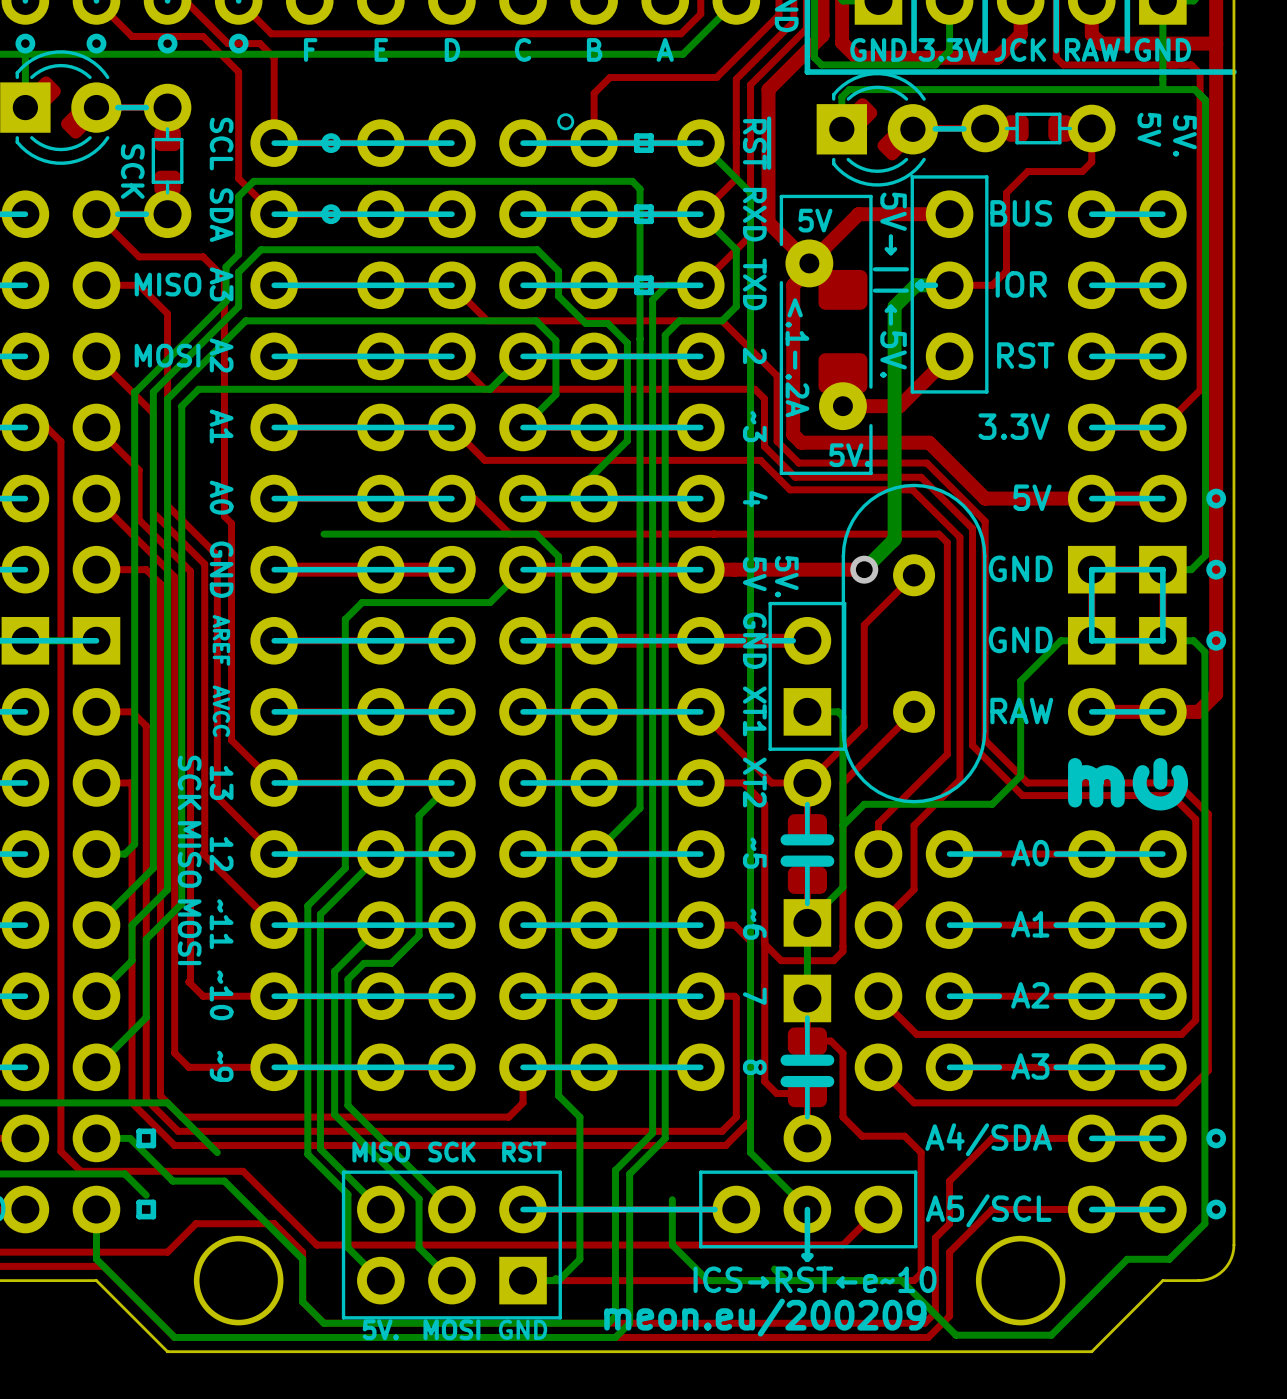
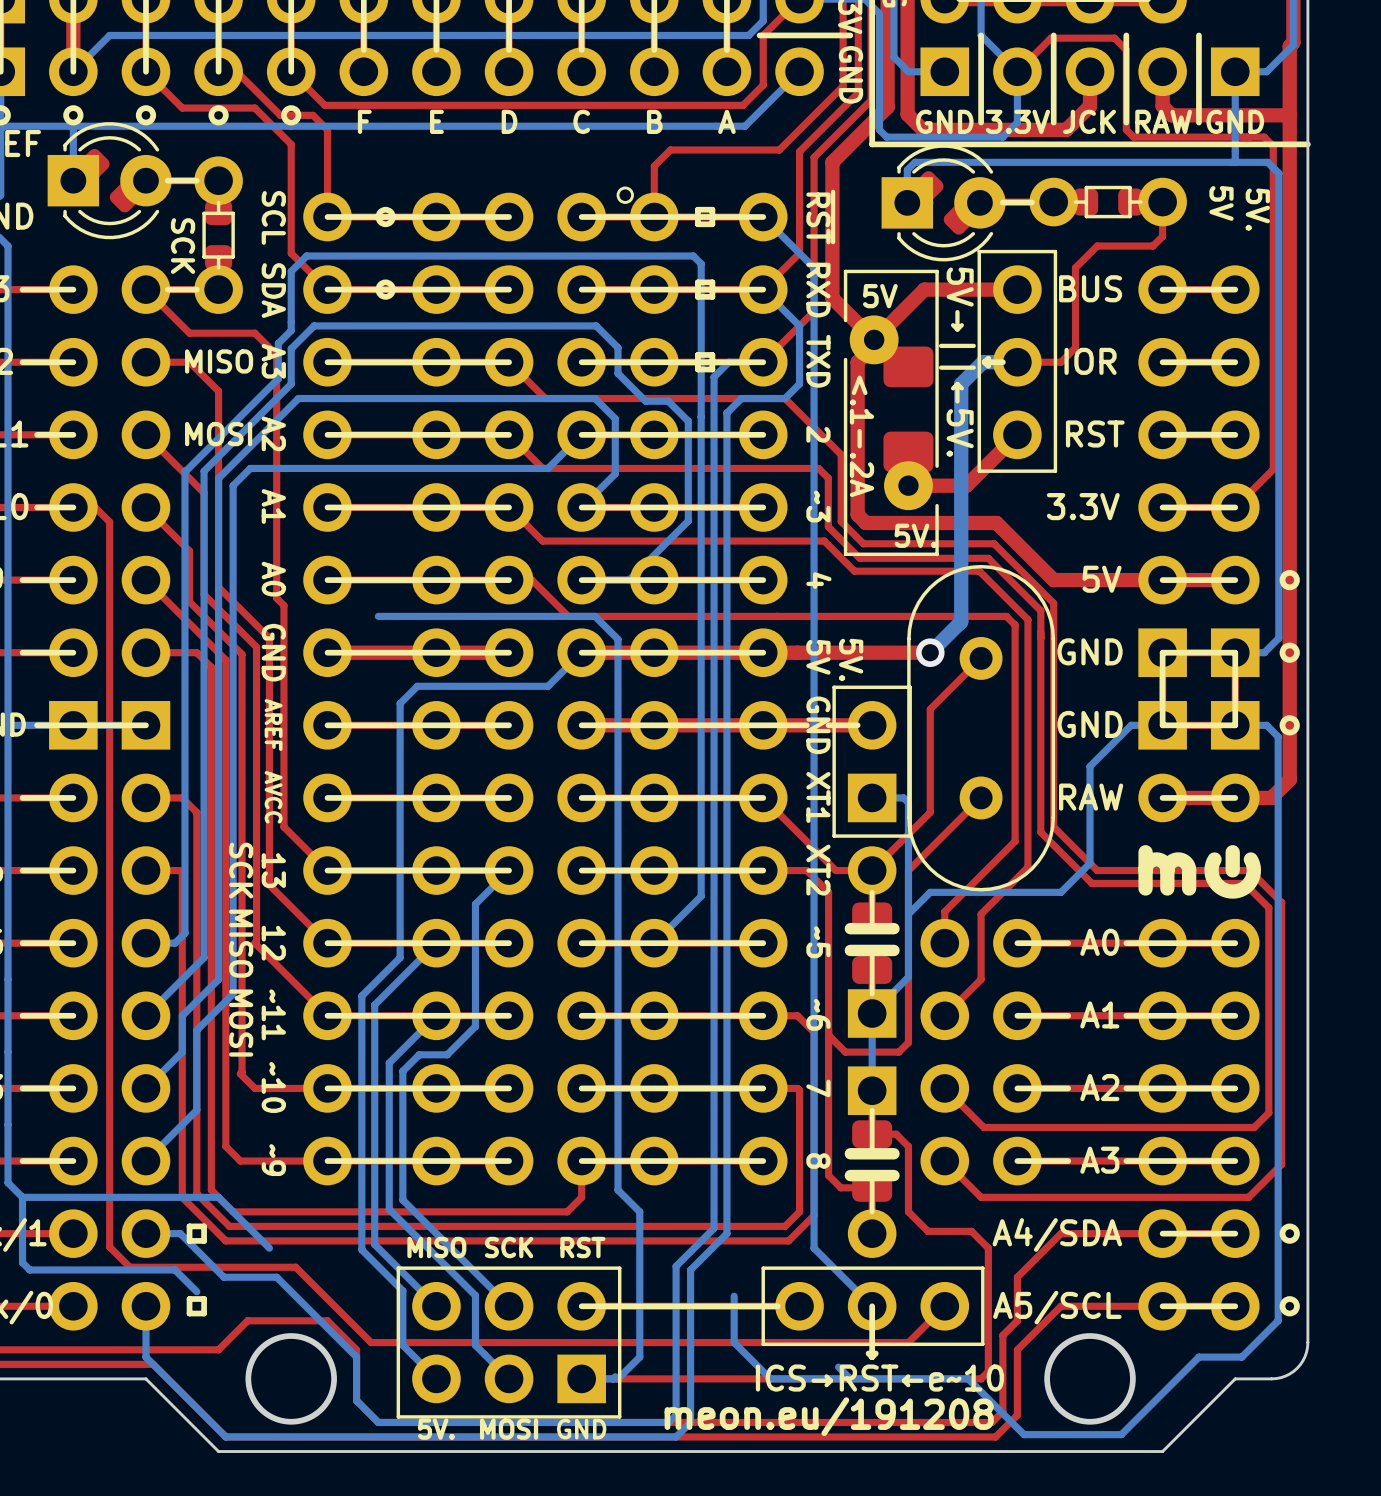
text: meon.eu/200209 (765, 1317) -> meon.eu/191208 (829, 1416)

